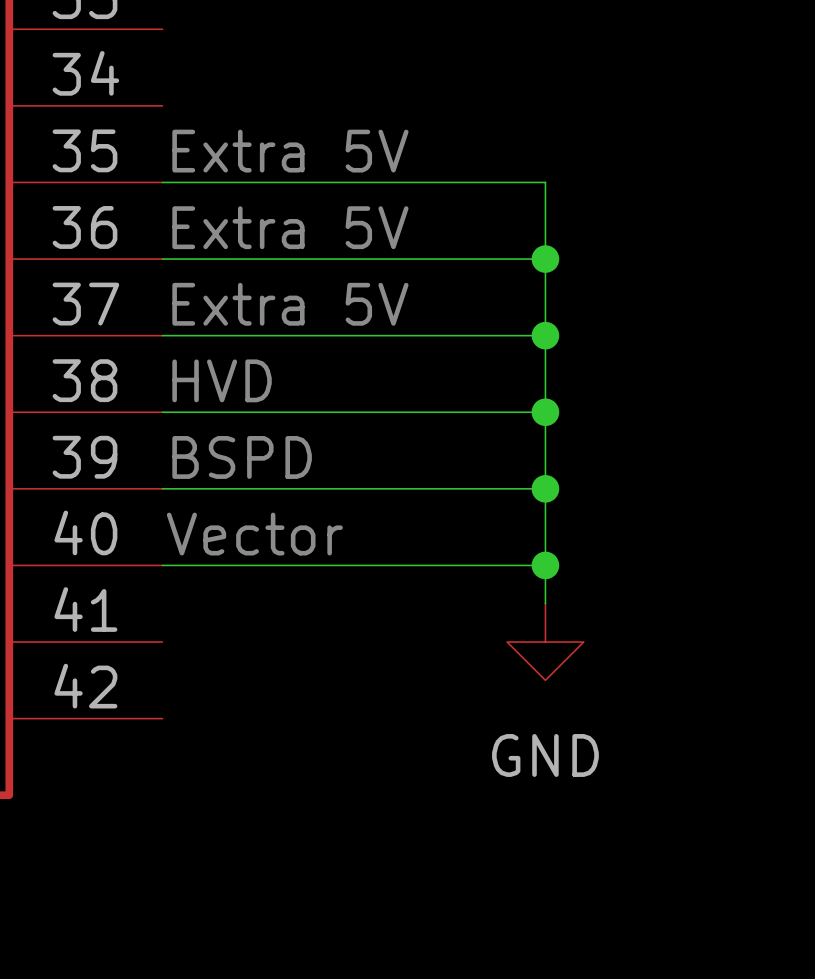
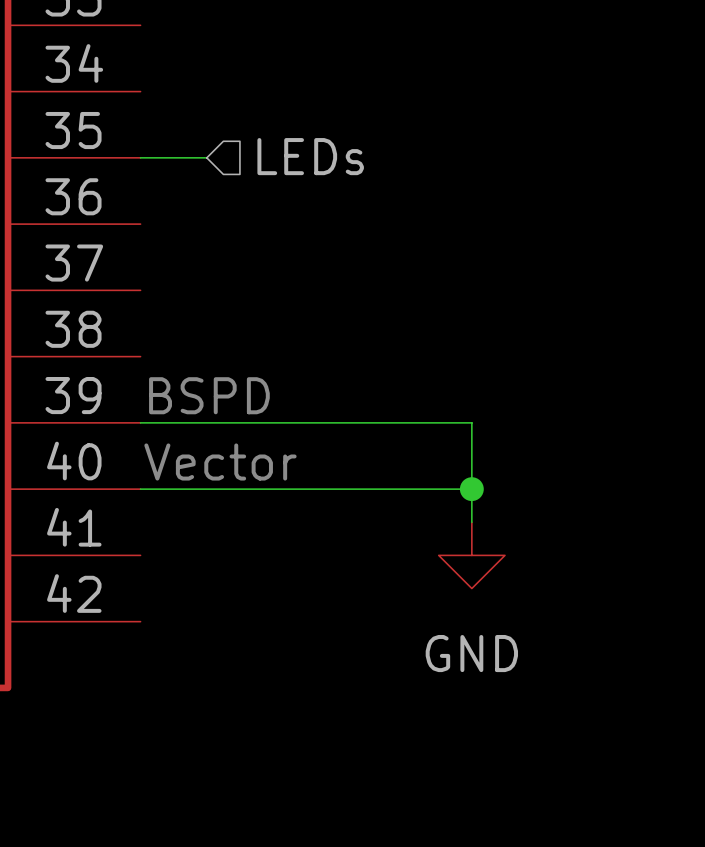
text: Extra 5V (290, 151) -> none
hierarchical label: none -> LEDs (310, 156)
wire: (239, 182) (545, 182) (545, 488) -> none
text: Extra 5V (290, 227) -> none
wire: (162, 259) (545, 259) -> none
junction: (545, 259) -> none
text: Extra 5V (290, 304) -> none
wire: (162, 335) (545, 335) -> none
junction: (545, 335) -> none
text: HVD (222, 380) -> none
wire: (162, 412) (545, 412) -> none
junction: (545, 412) -> none
junction: (545, 488) -> none

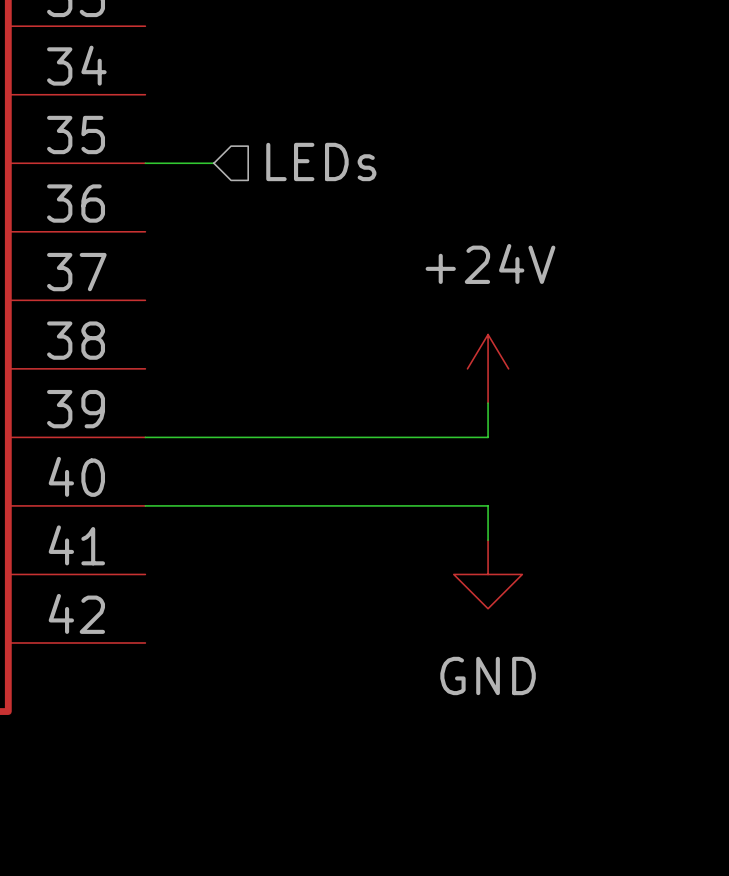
power symbol: none -> +24V (488, 368)
text: BSPD (209, 395) -> none
wire: (471, 422) (471, 489) -> (488, 437) (488, 403)
text: Vector (220, 461) -> none
junction: (471, 489) -> none

